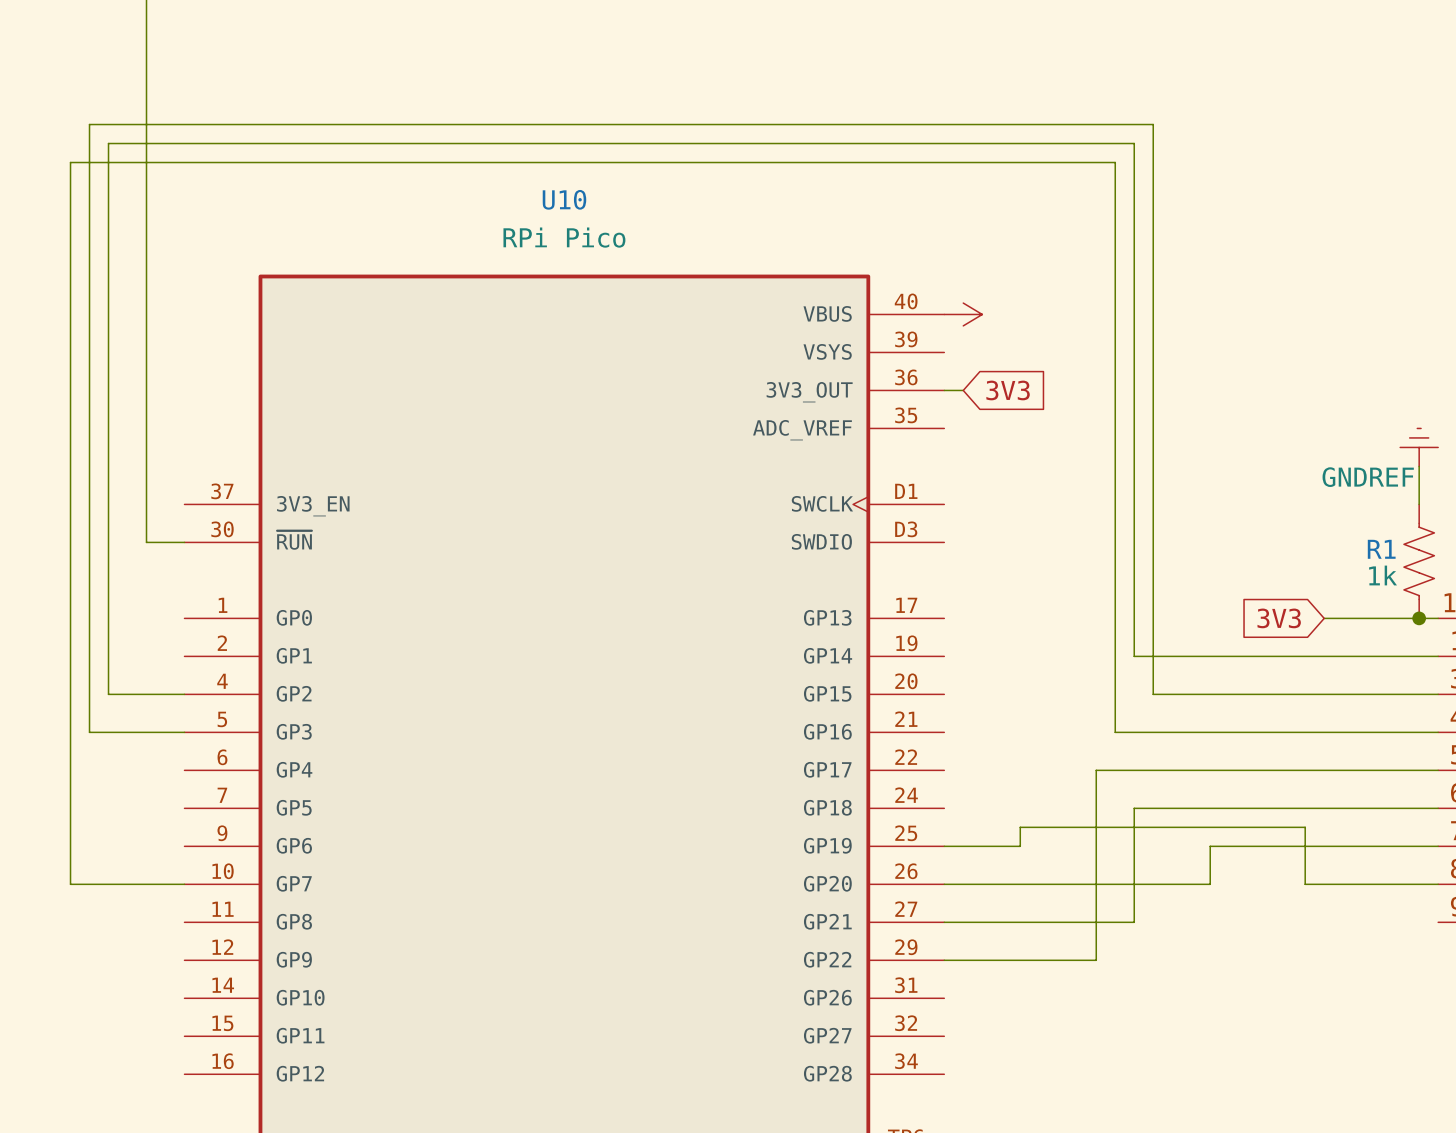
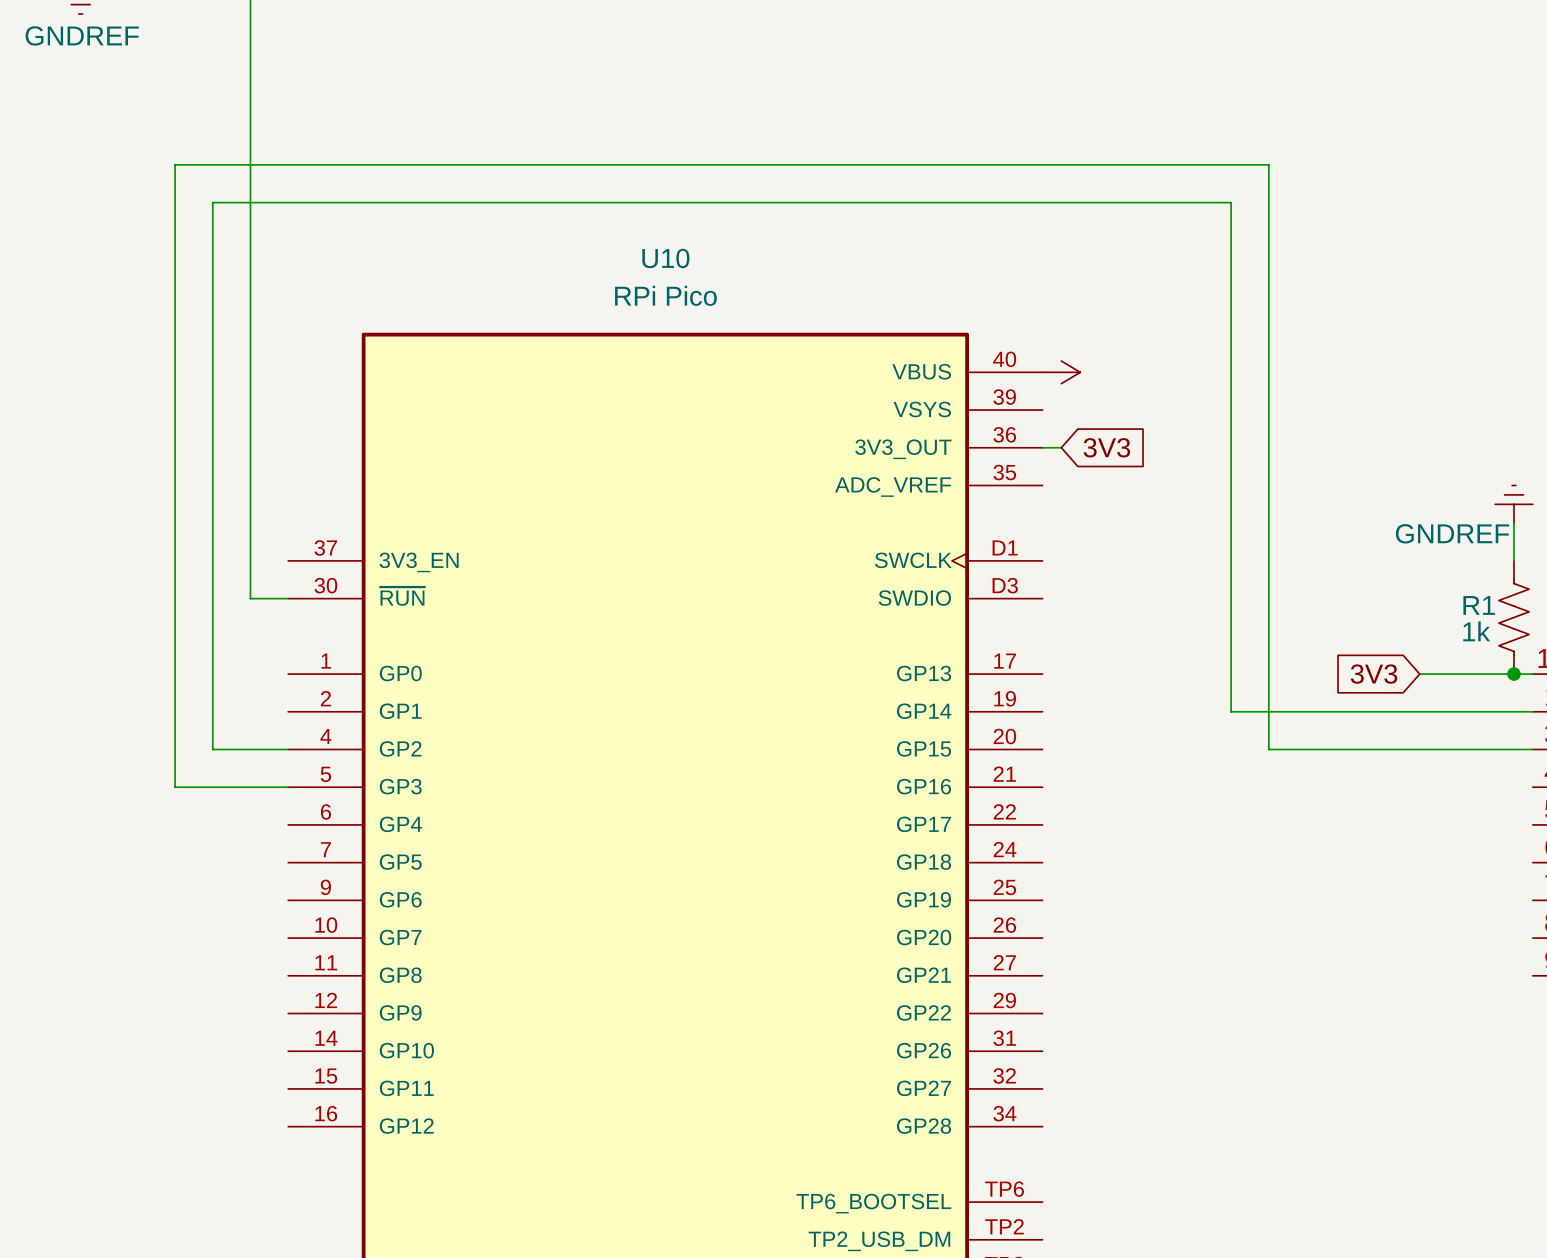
wire: (70, 162) (1115, 162) (1115, 732) (1438, 732) -> (175, 221) (175, 164) (1268, 164) (1268, 749)
wire: (1172, 694) (1153, 694) (1153, 124) (89, 124) (89, 732) -> none
wire: (70, 732) (70, 884) (184, 884) -> (175, 787) (193, 787)
wire: (1438, 770) (1096, 770) (1096, 960) (944, 960) -> none
wire: (1438, 808) (1134, 808) (1134, 922) (944, 922) -> none
wire: (944, 846) (1020, 846) (1020, 827) (1305, 827) (1305, 884) (1438, 884) -> none
wire: (1438, 846) (1210, 846) (1210, 884) (944, 884) -> none

